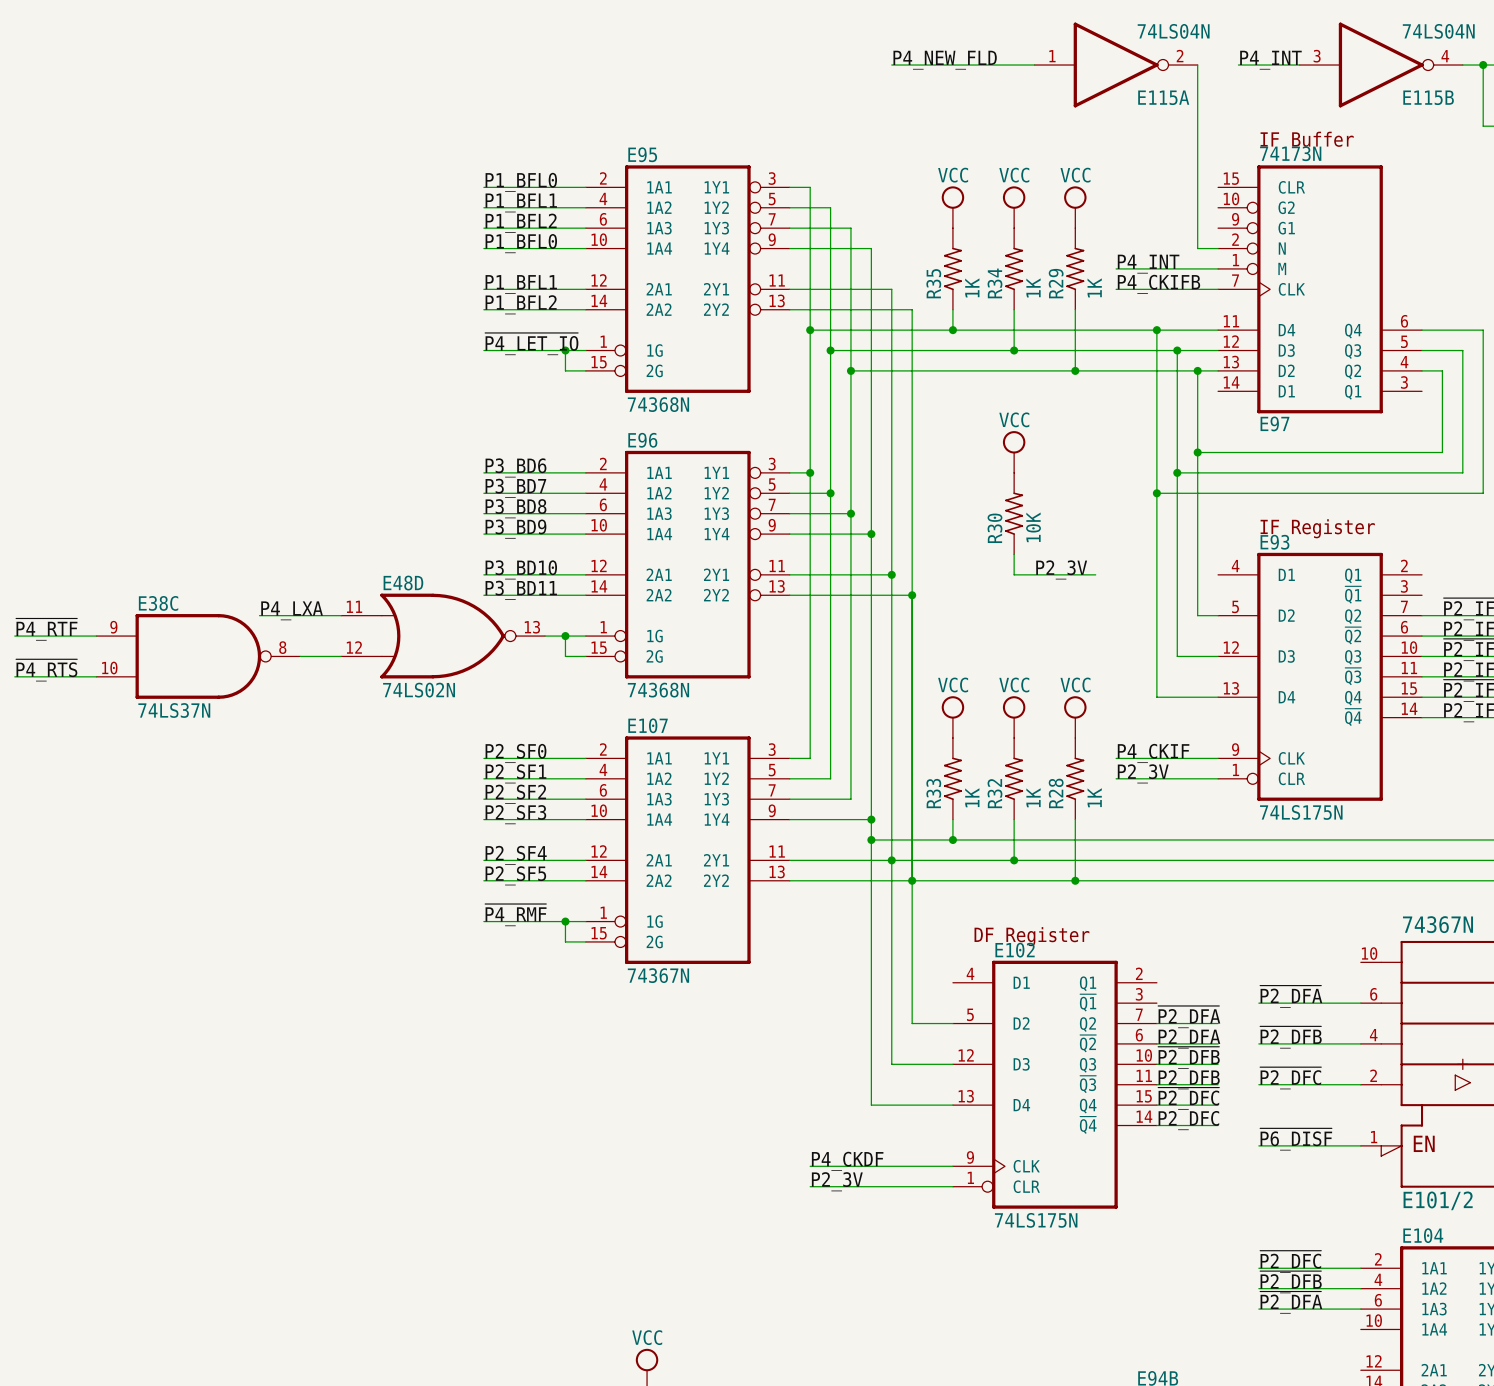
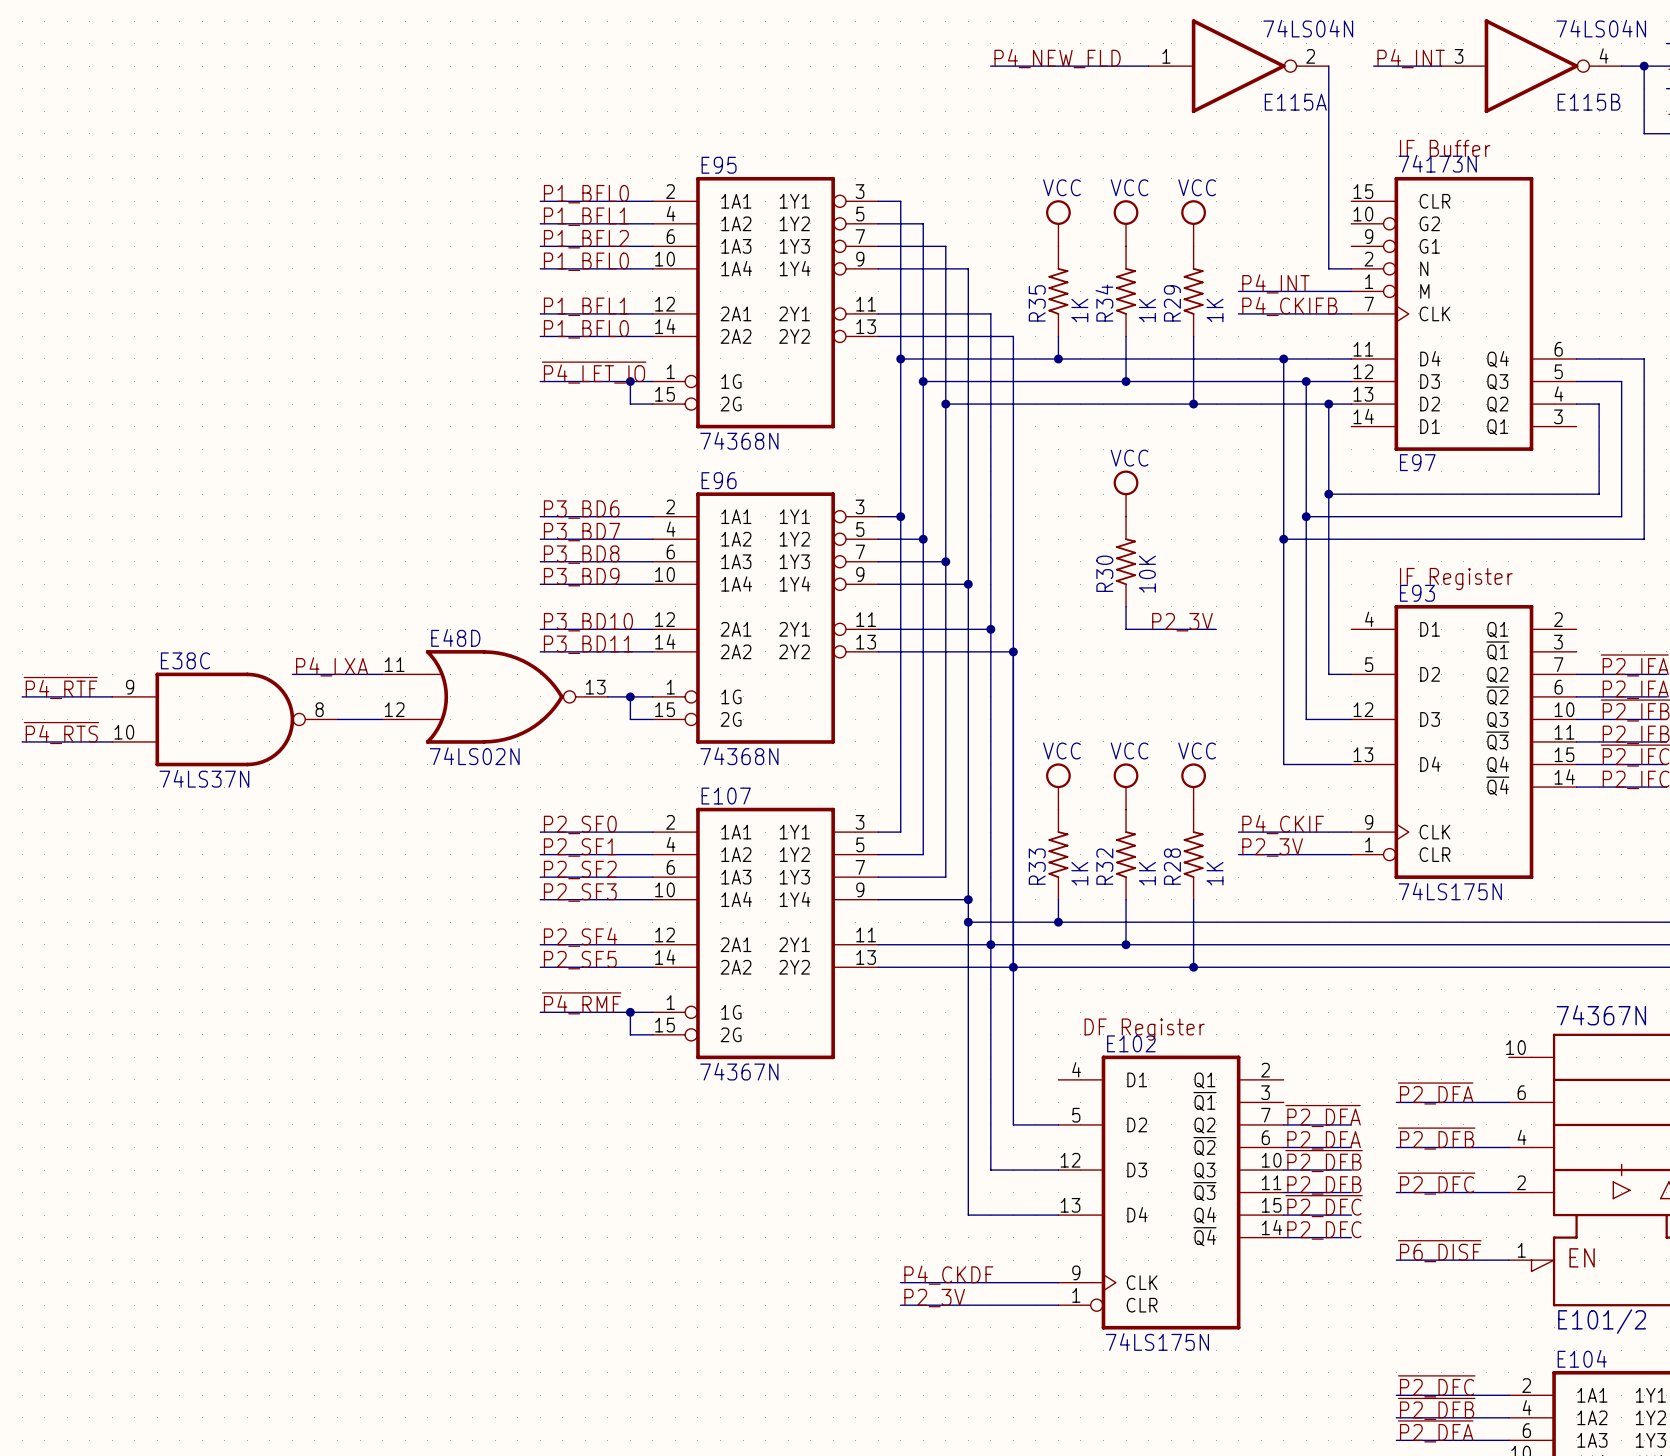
label: P1_BFL2 (521, 304) -> P1_BFL0 (586, 329)

